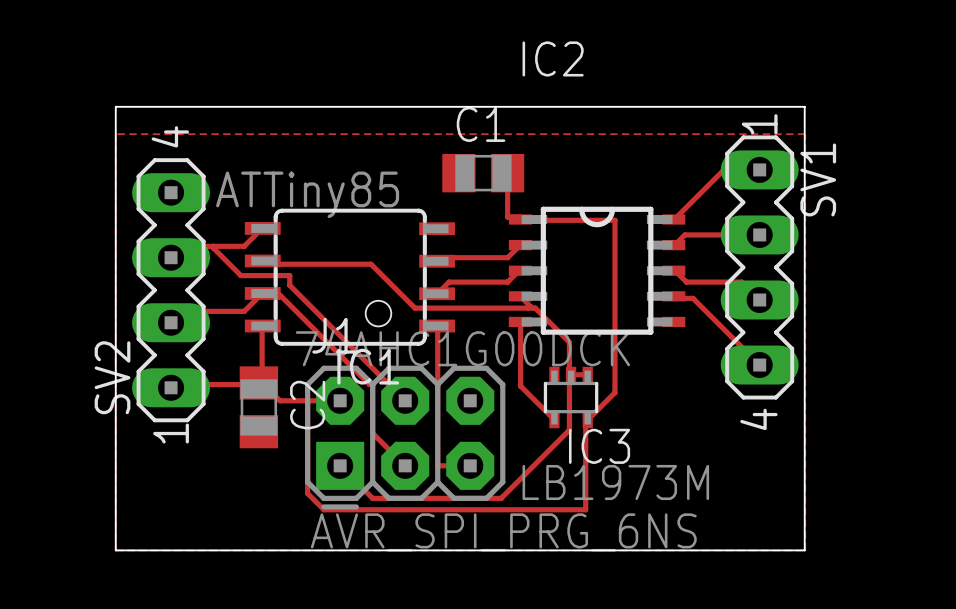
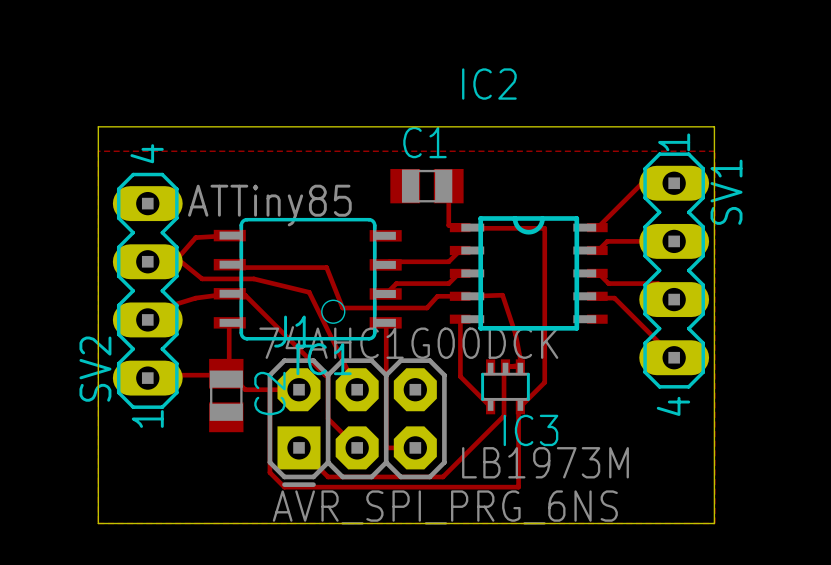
track: (262, 228) (244, 246) (182, 246) -> (229, 235) (195, 237) (177, 258) (157, 251)
track: (213, 246) (240, 275) (289, 275) (289, 285) (405, 400) -> (177, 258) (202, 278) (253, 278) (309, 292) (357, 389)
track: (371, 264) (414, 308) (528, 308) (530, 306) -> (326, 267) (342, 308) (426, 308) (437, 296) (460, 296)
track: (262, 293) (244, 311) (182, 311) -> (229, 293) (195, 298) (157, 309)
track: (520, 296) (532, 308) (535, 308) (569, 342) (571, 375) -> (460, 296) (502, 295) (515, 334) (521, 365) (505, 367)

